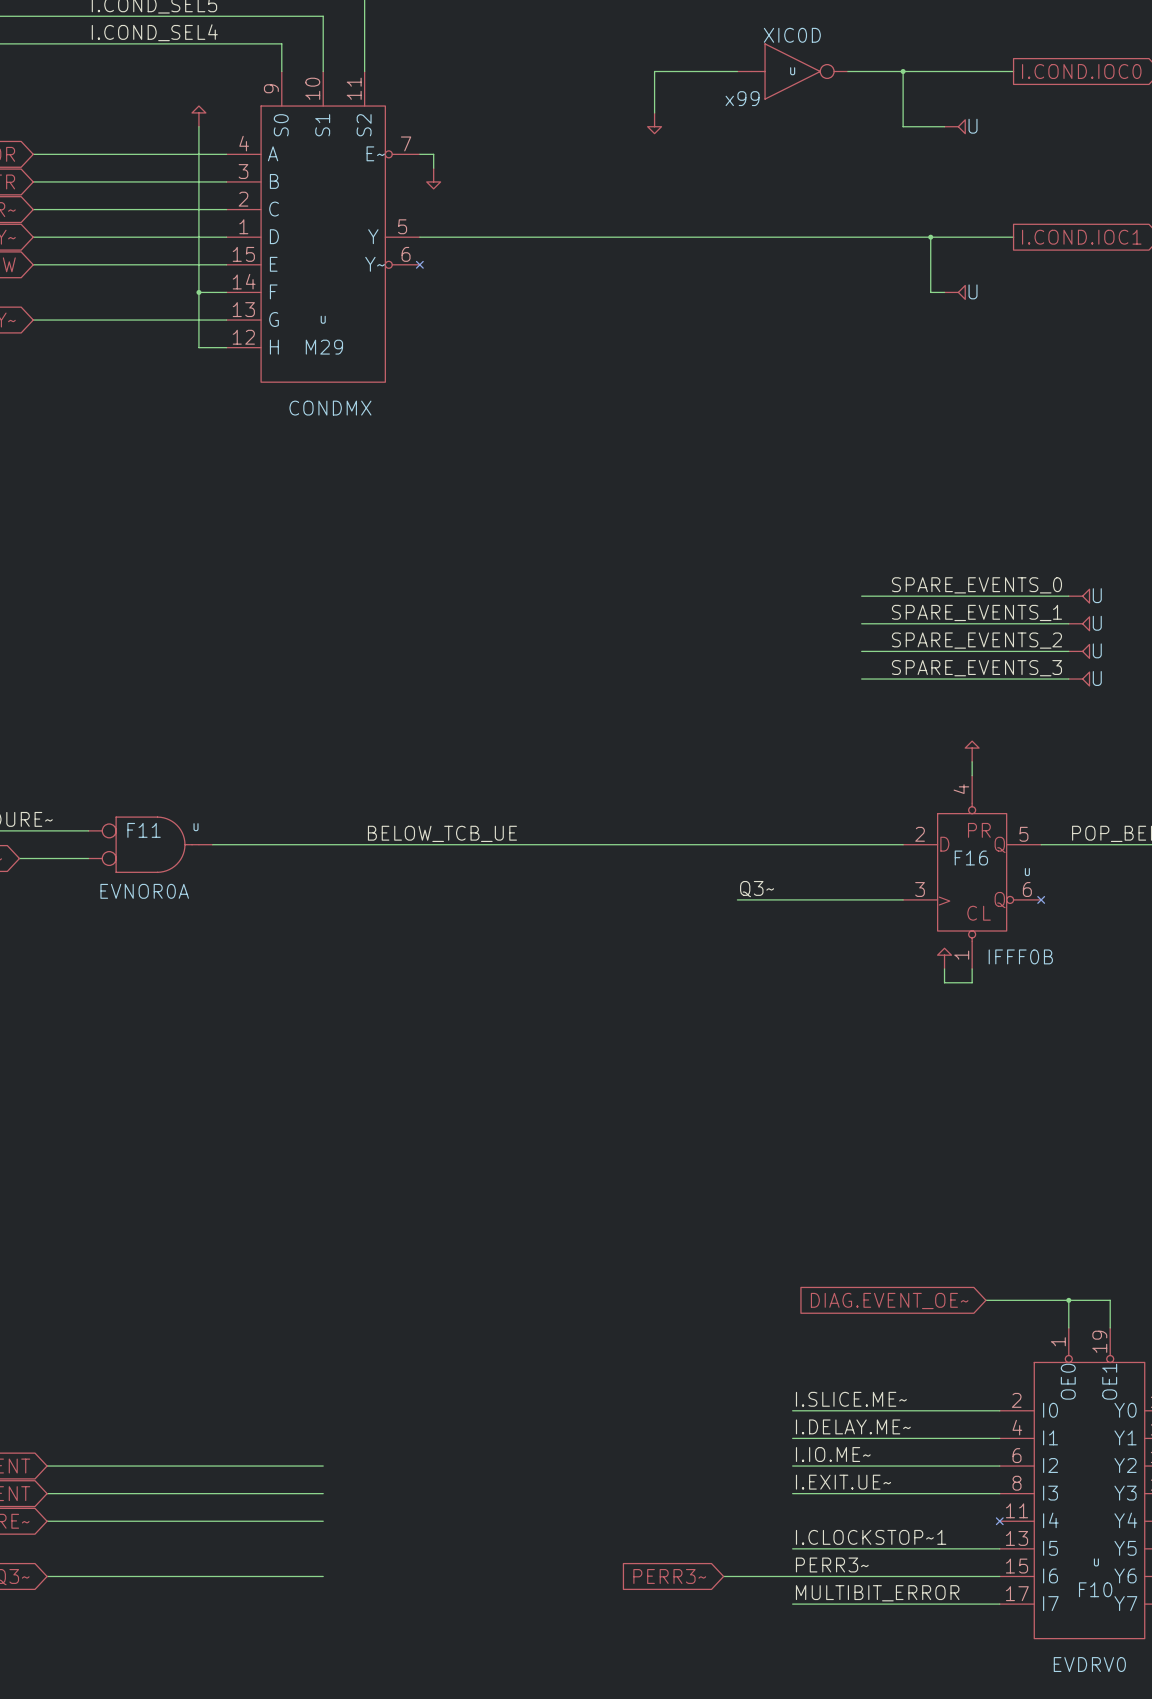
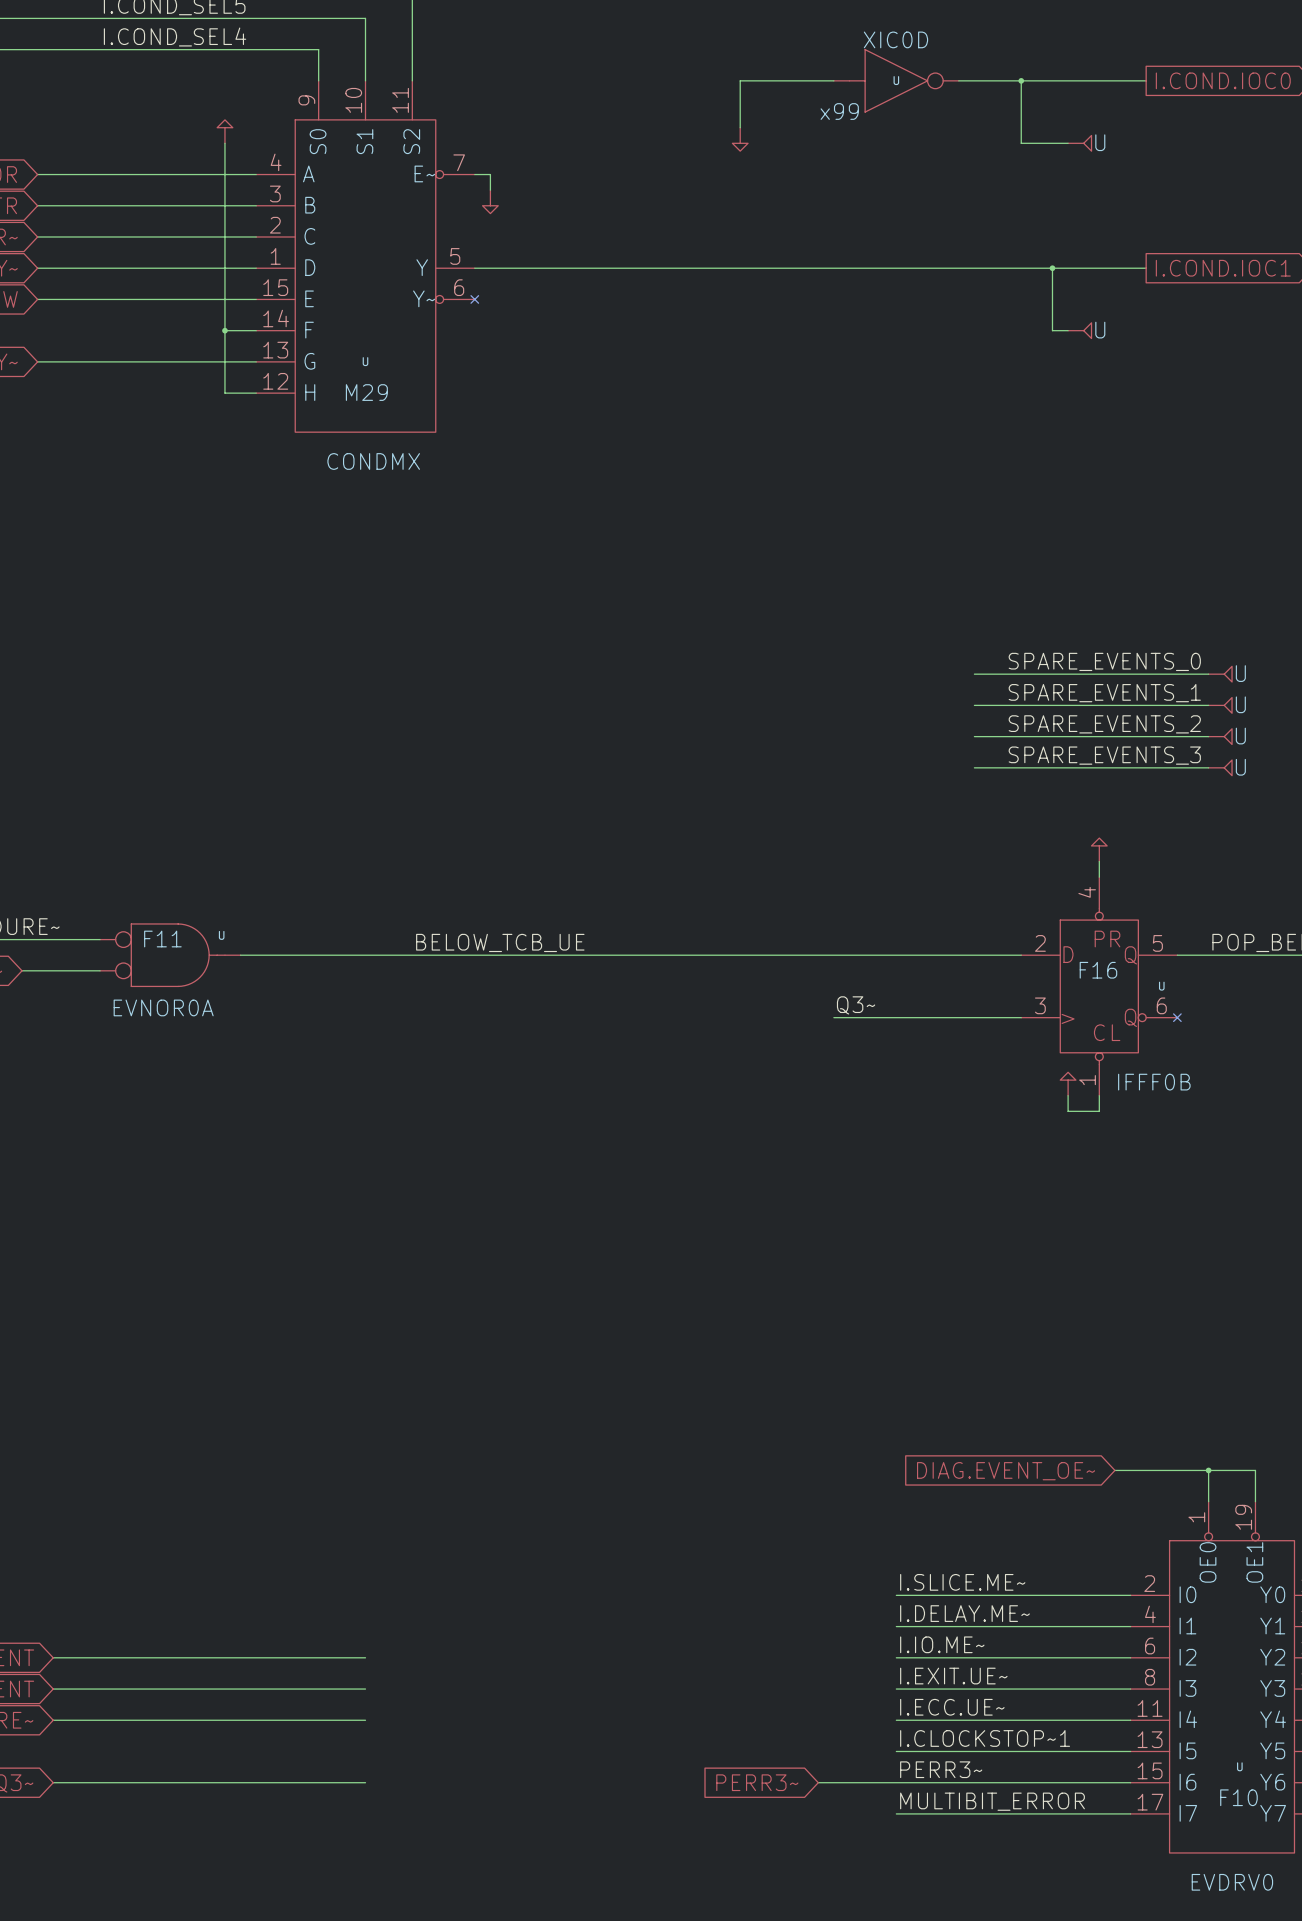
label: none -> I.ECC.UE~ (952, 1707)
wire: none -> (896, 1720) (1130, 1720)
no-connect mark: (999, 1521) -> none

